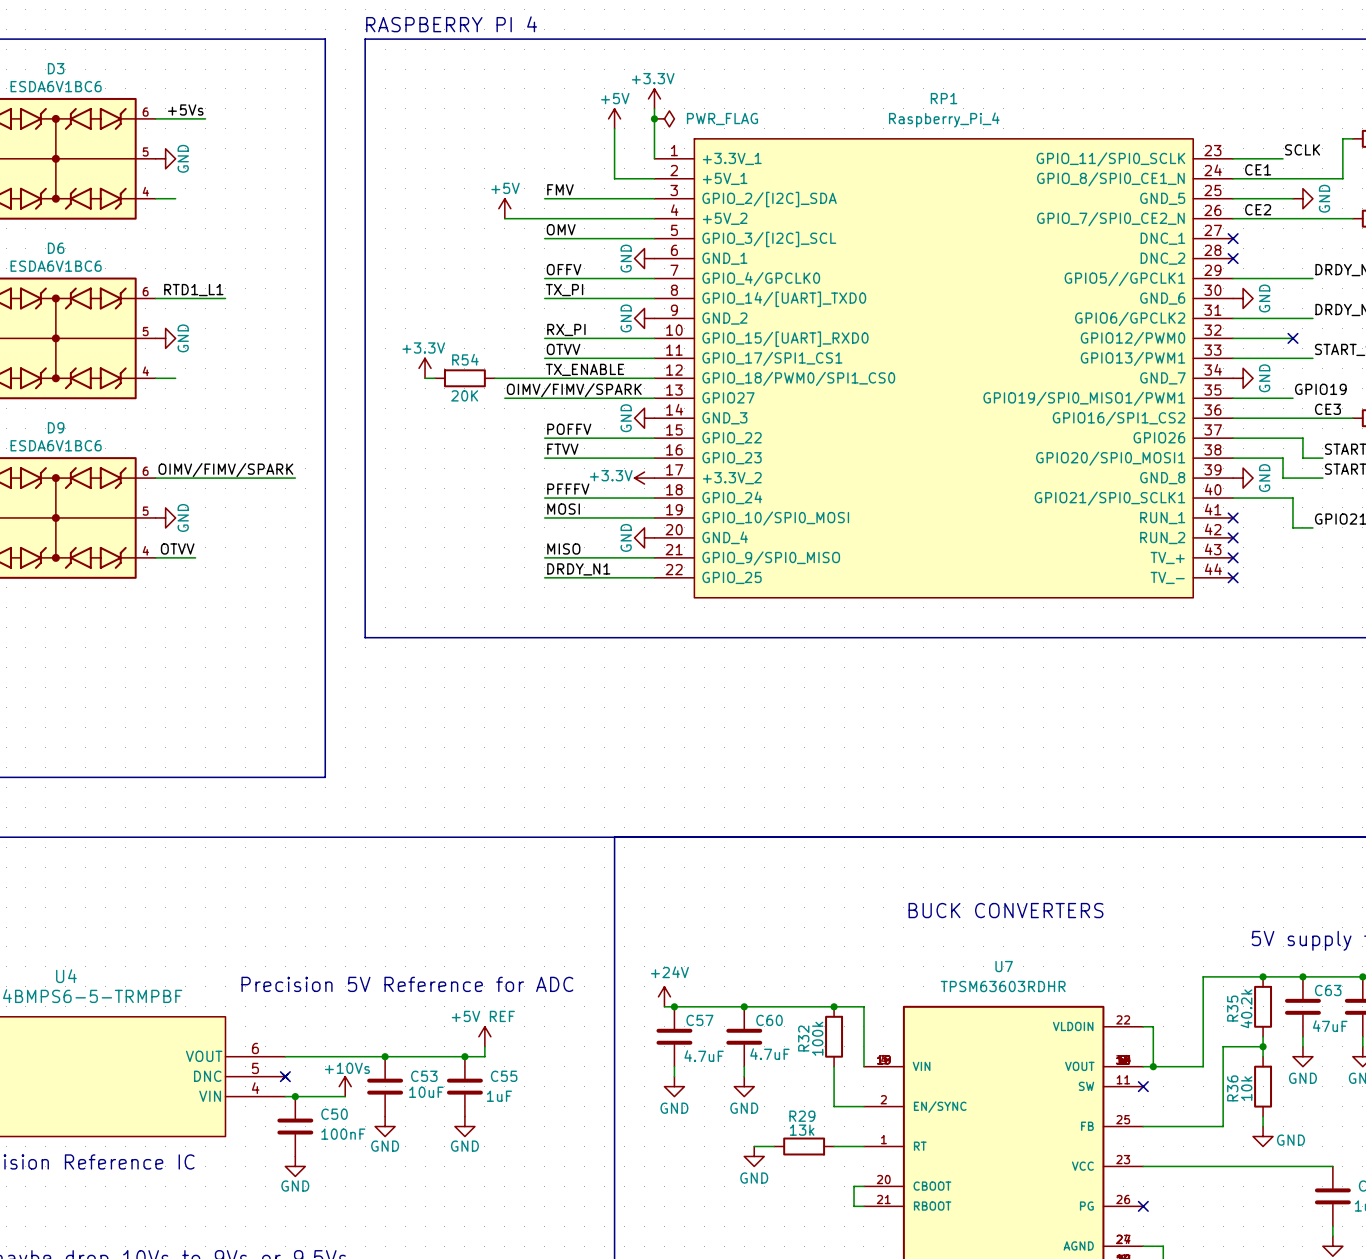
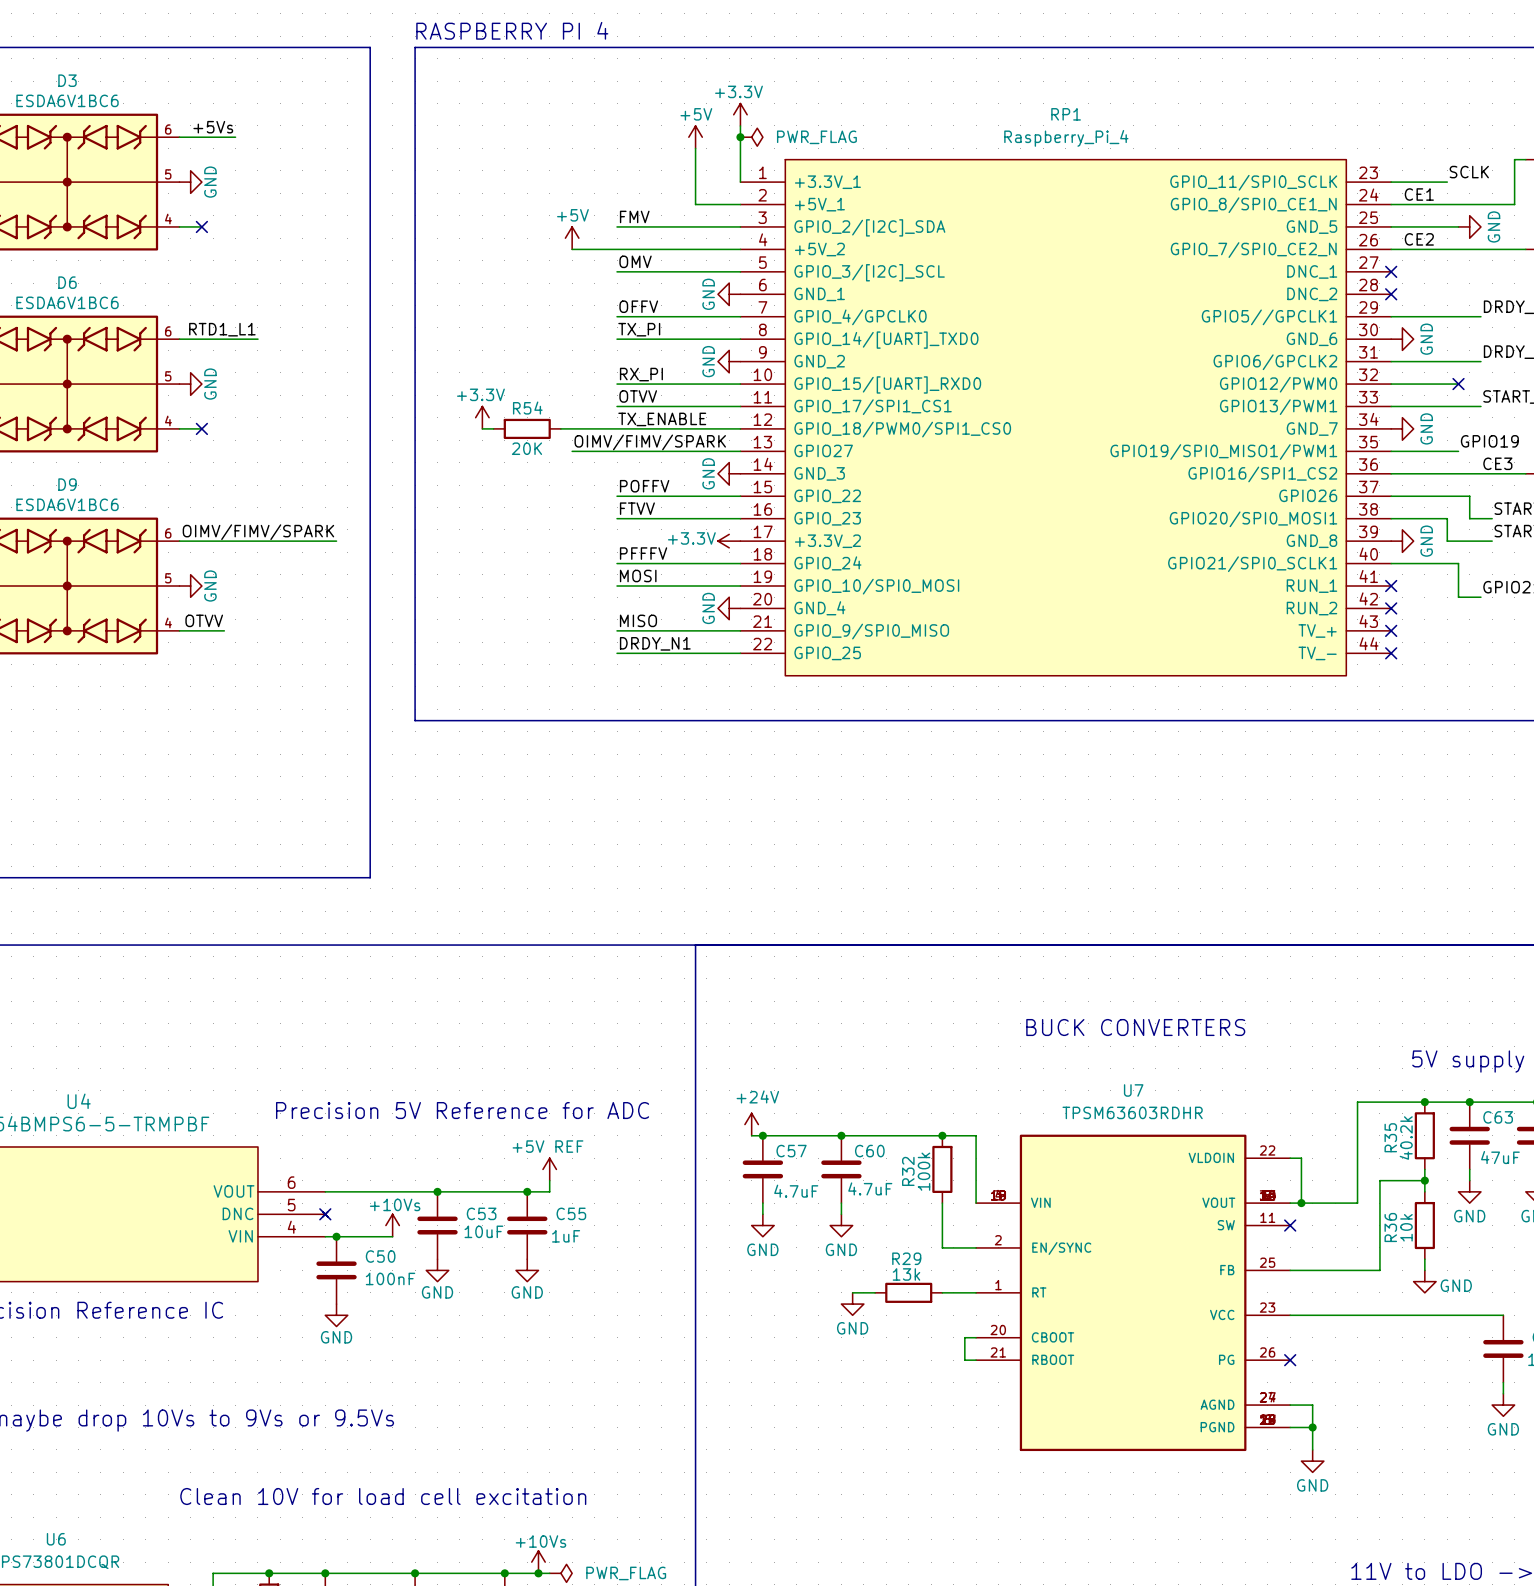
no-connect mark: none -> (201, 226)
no-connect mark: none -> (201, 428)

